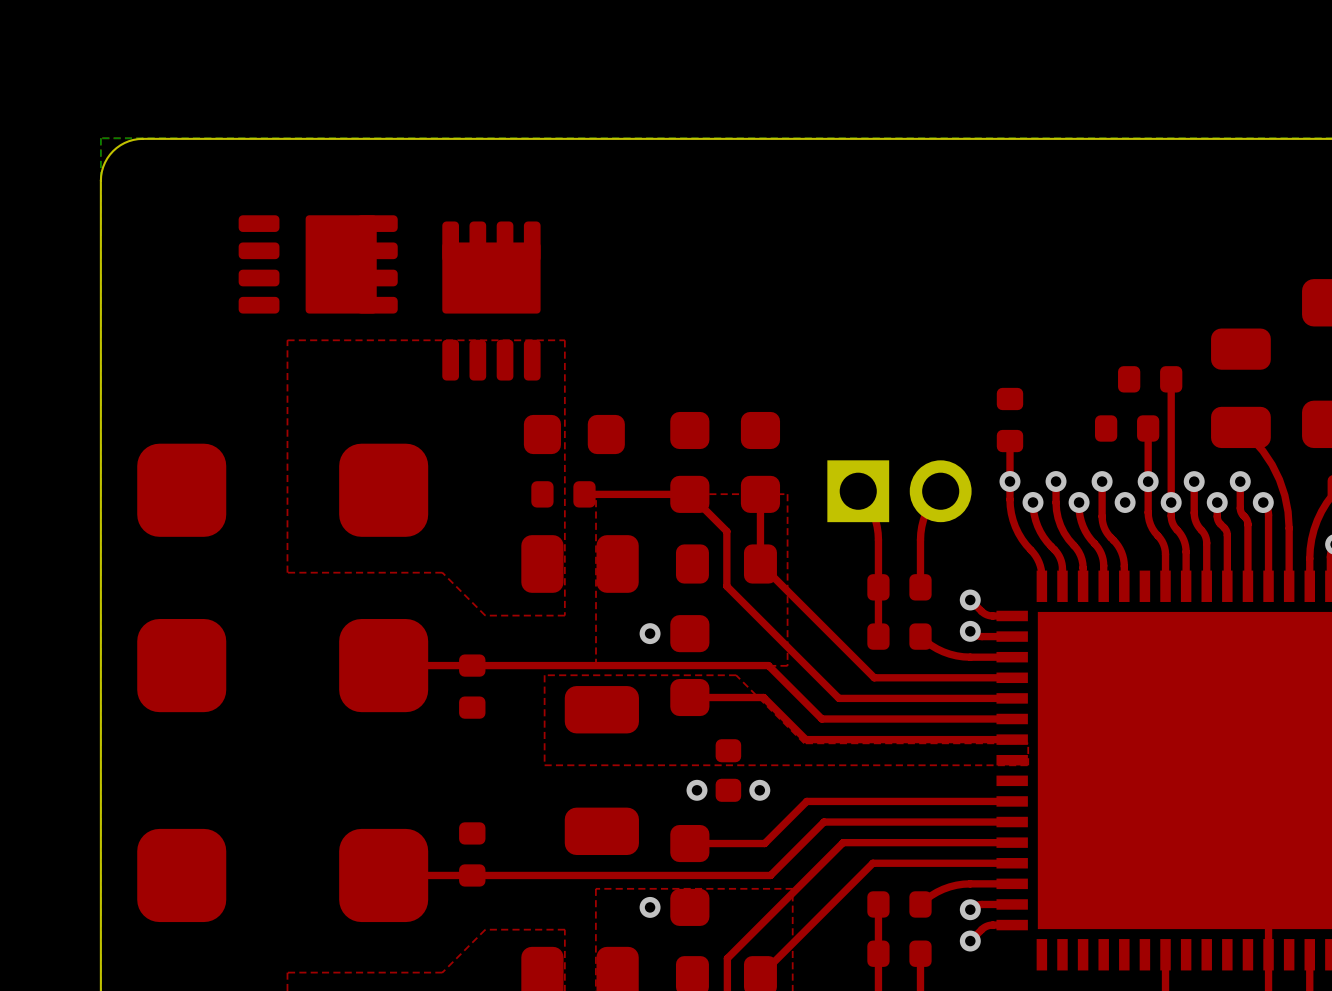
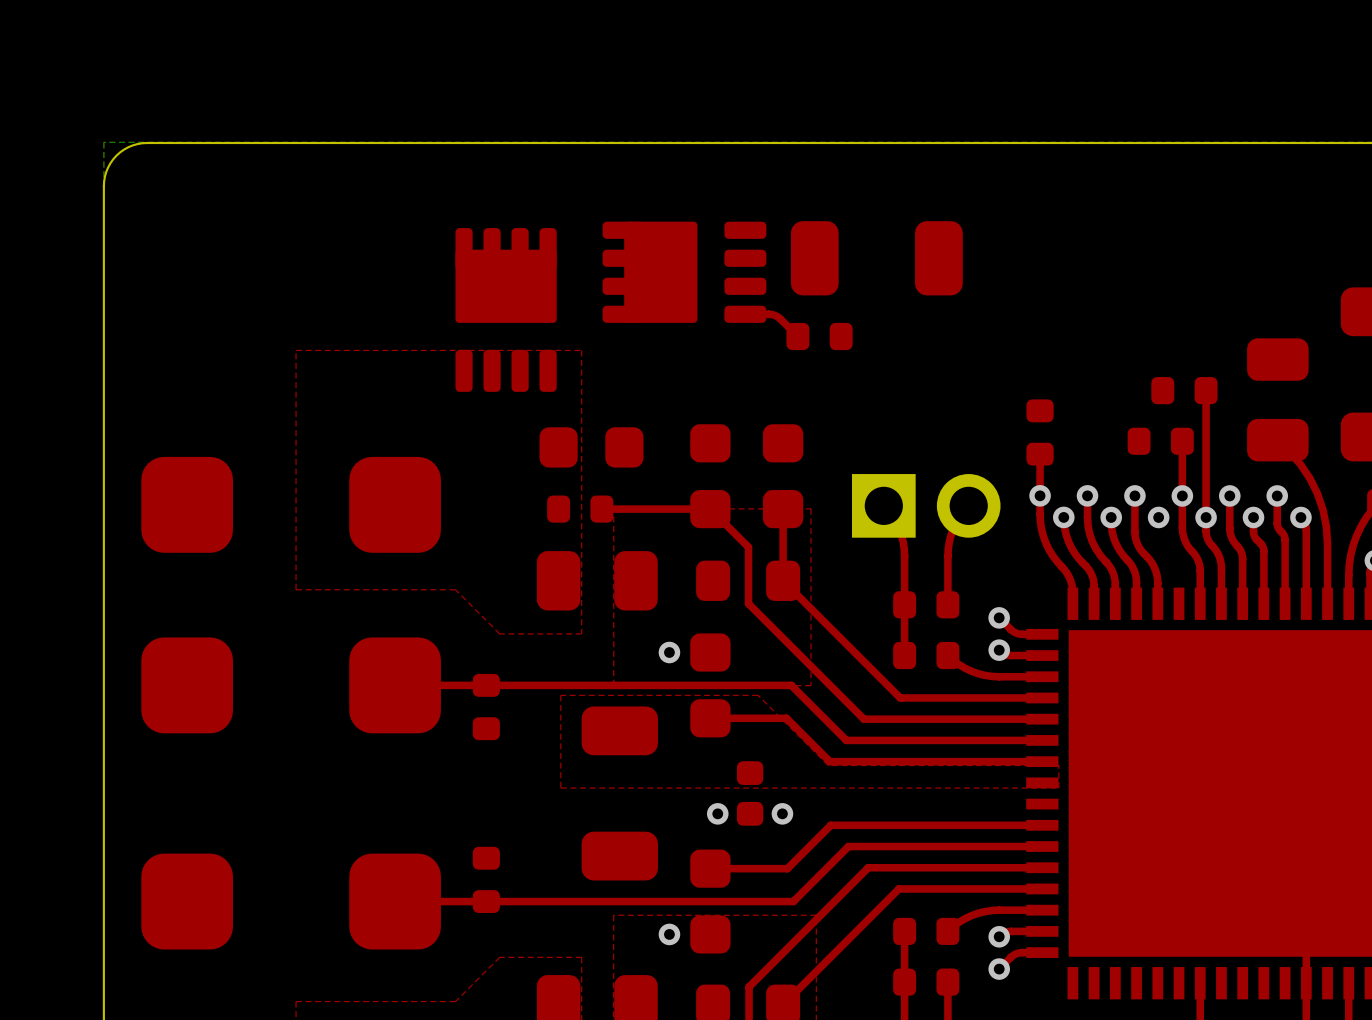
part: none -> (876, 258)
part rotation: 0° (318, 264) -> 180° (684, 272)
part position: (318, 264) -> (684, 272)
top track: none -> (745, 314) (775, 315) (797, 336)
part: none -> (819, 336)

